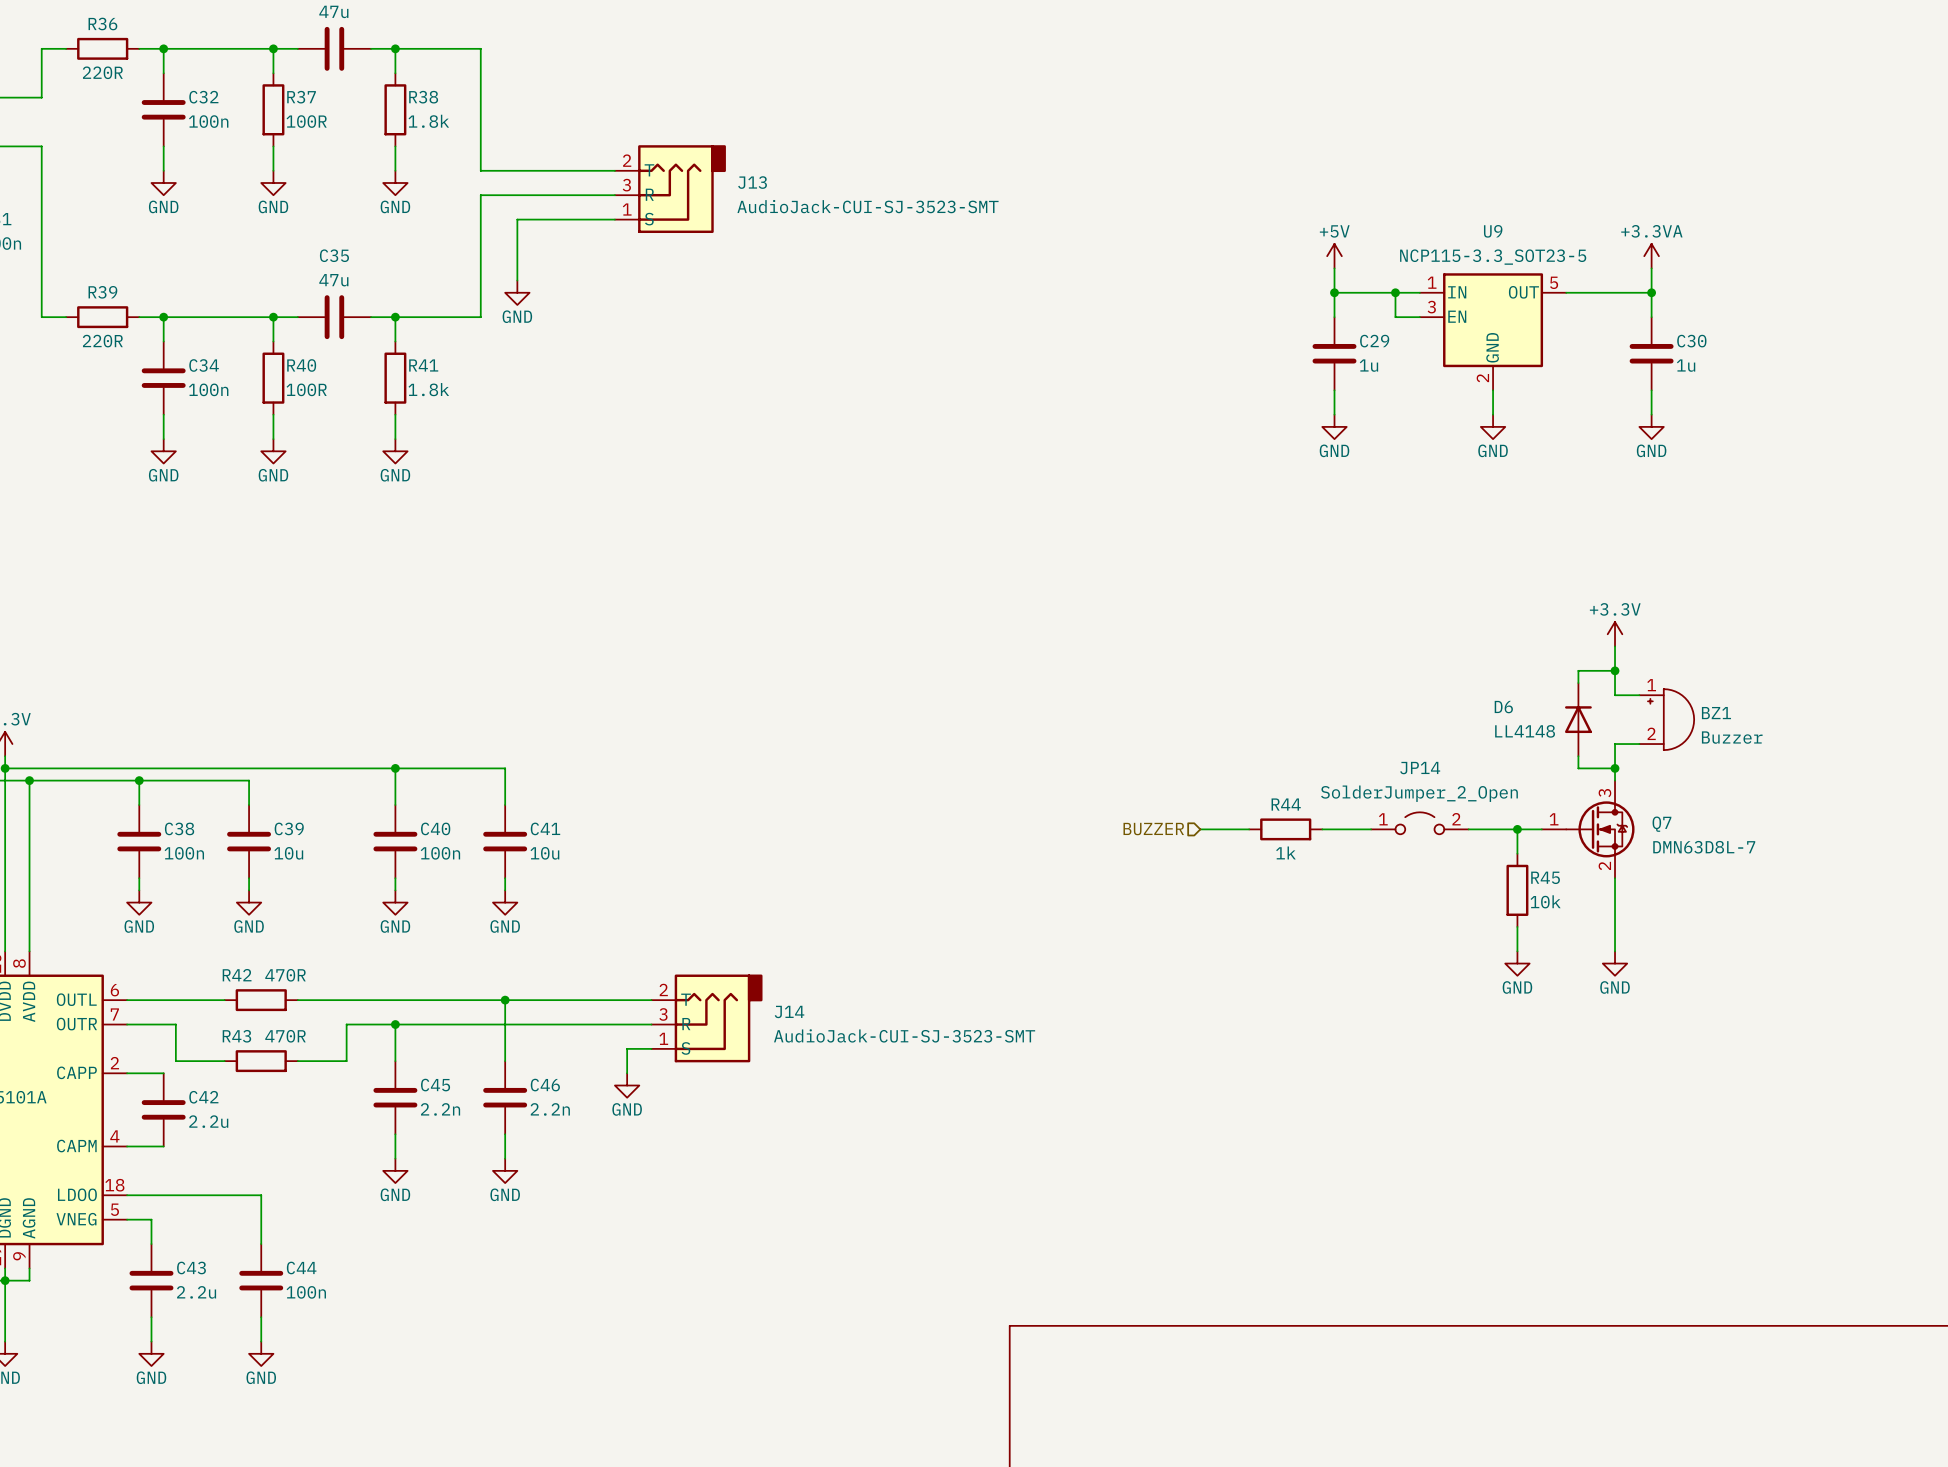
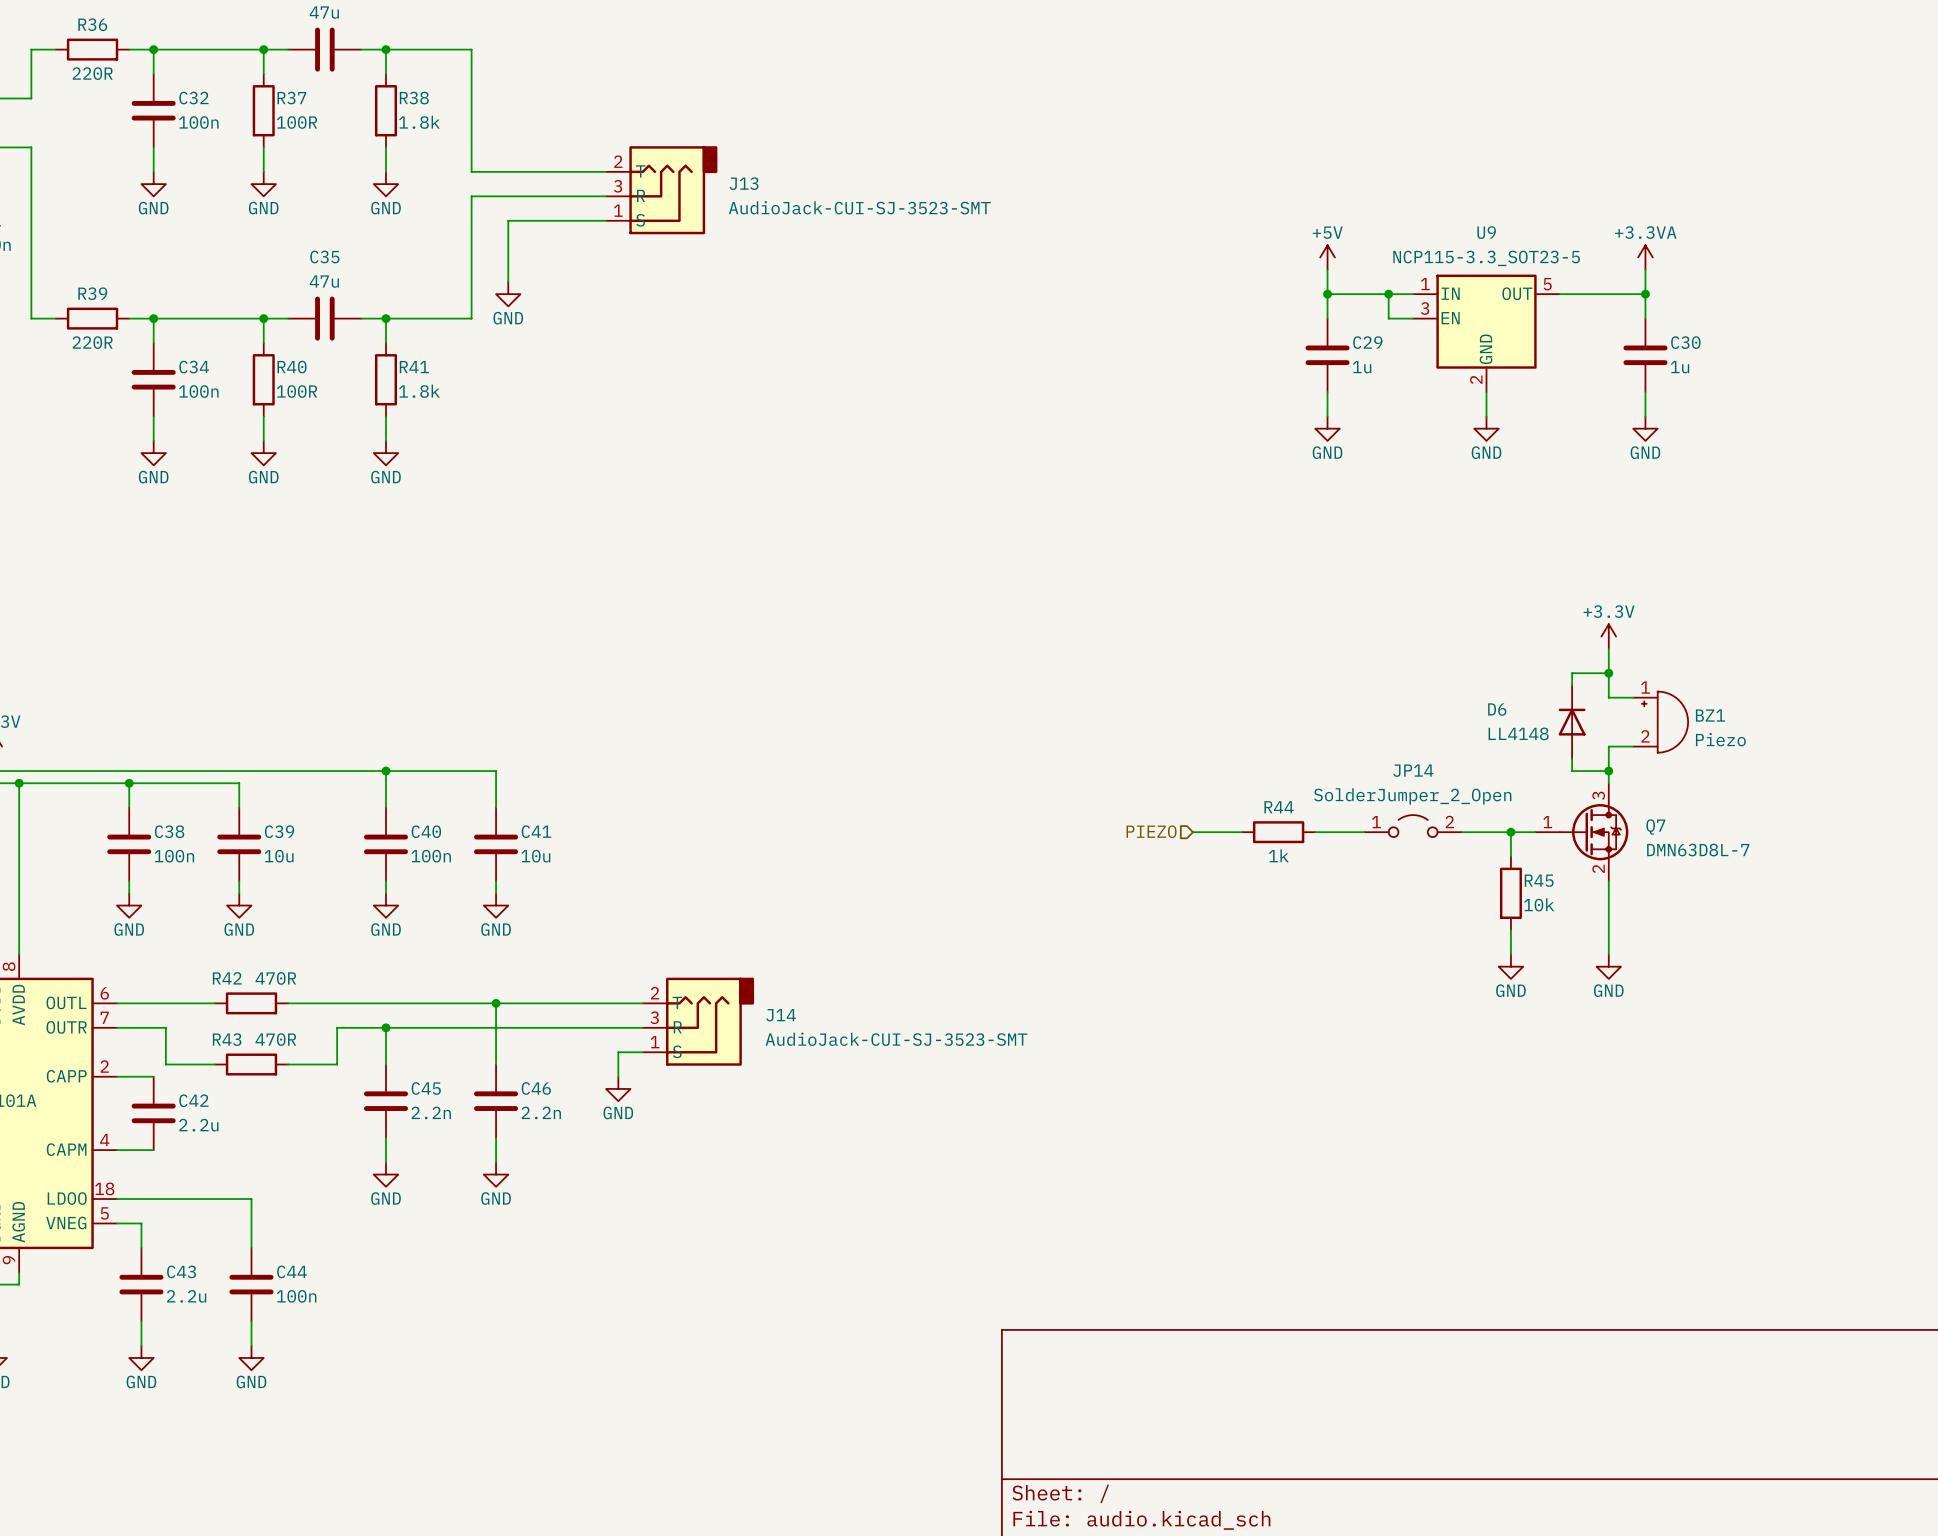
BZ1 value: Buzzer (1732, 737) -> Piezo (1720, 739)
hierarchical label: BUZZER (1153, 829) -> PIEZO (1151, 831)

